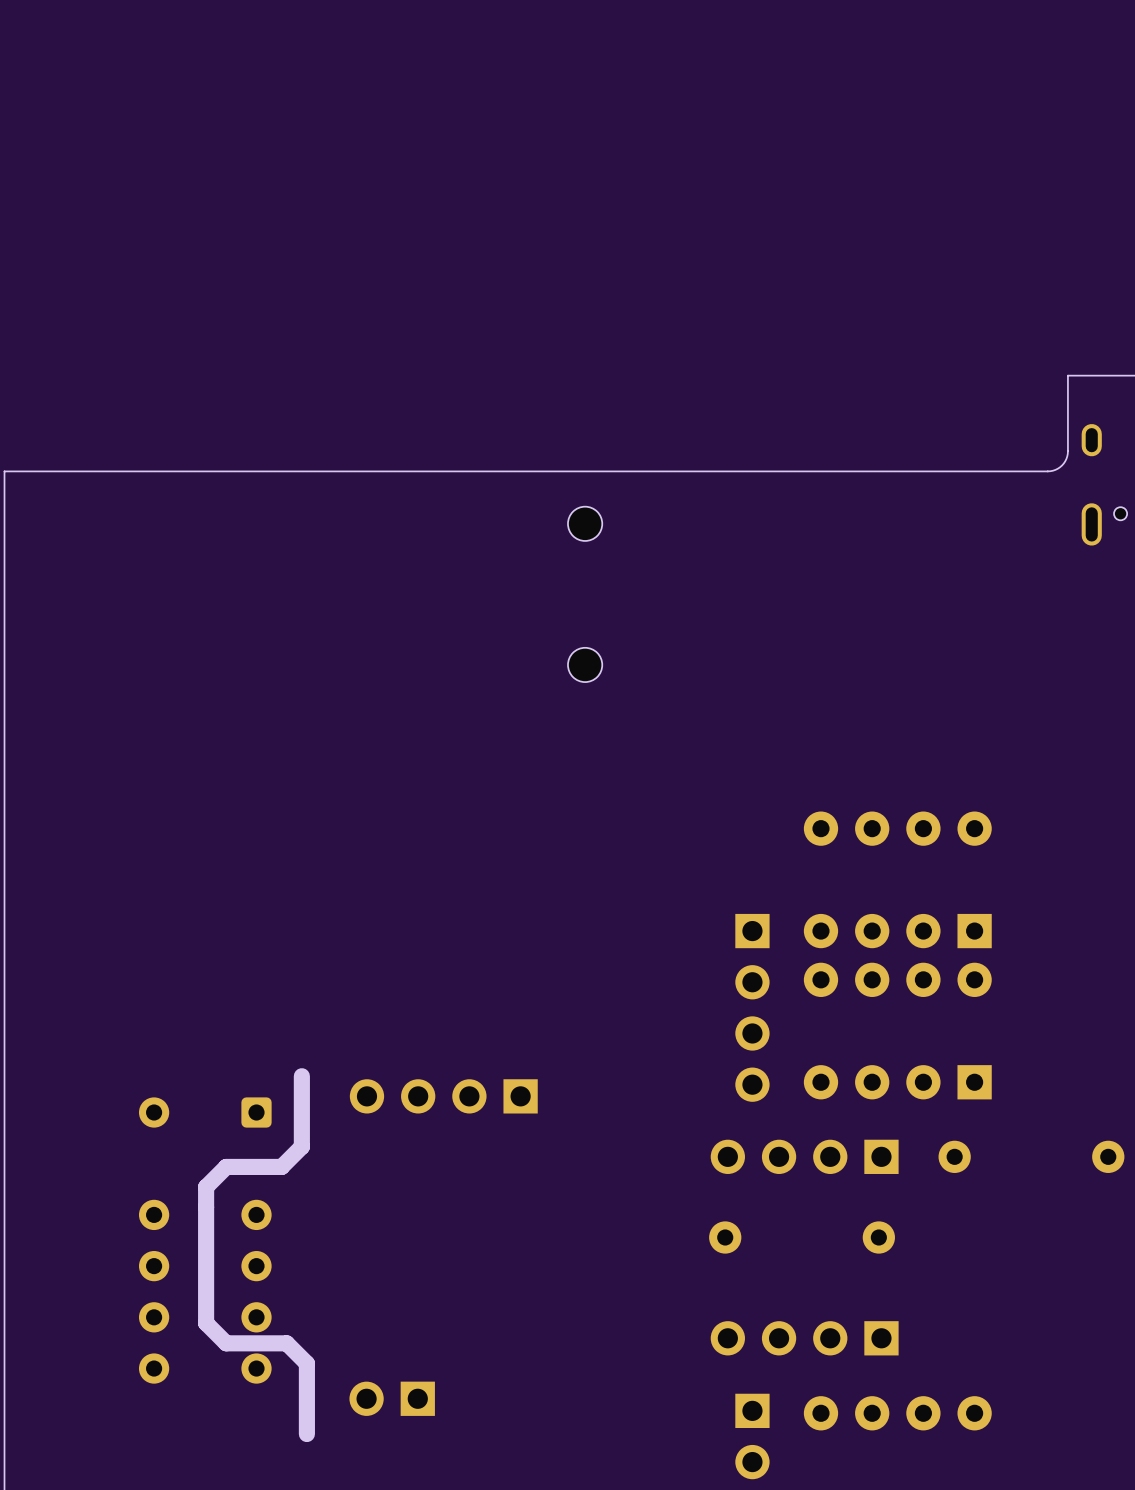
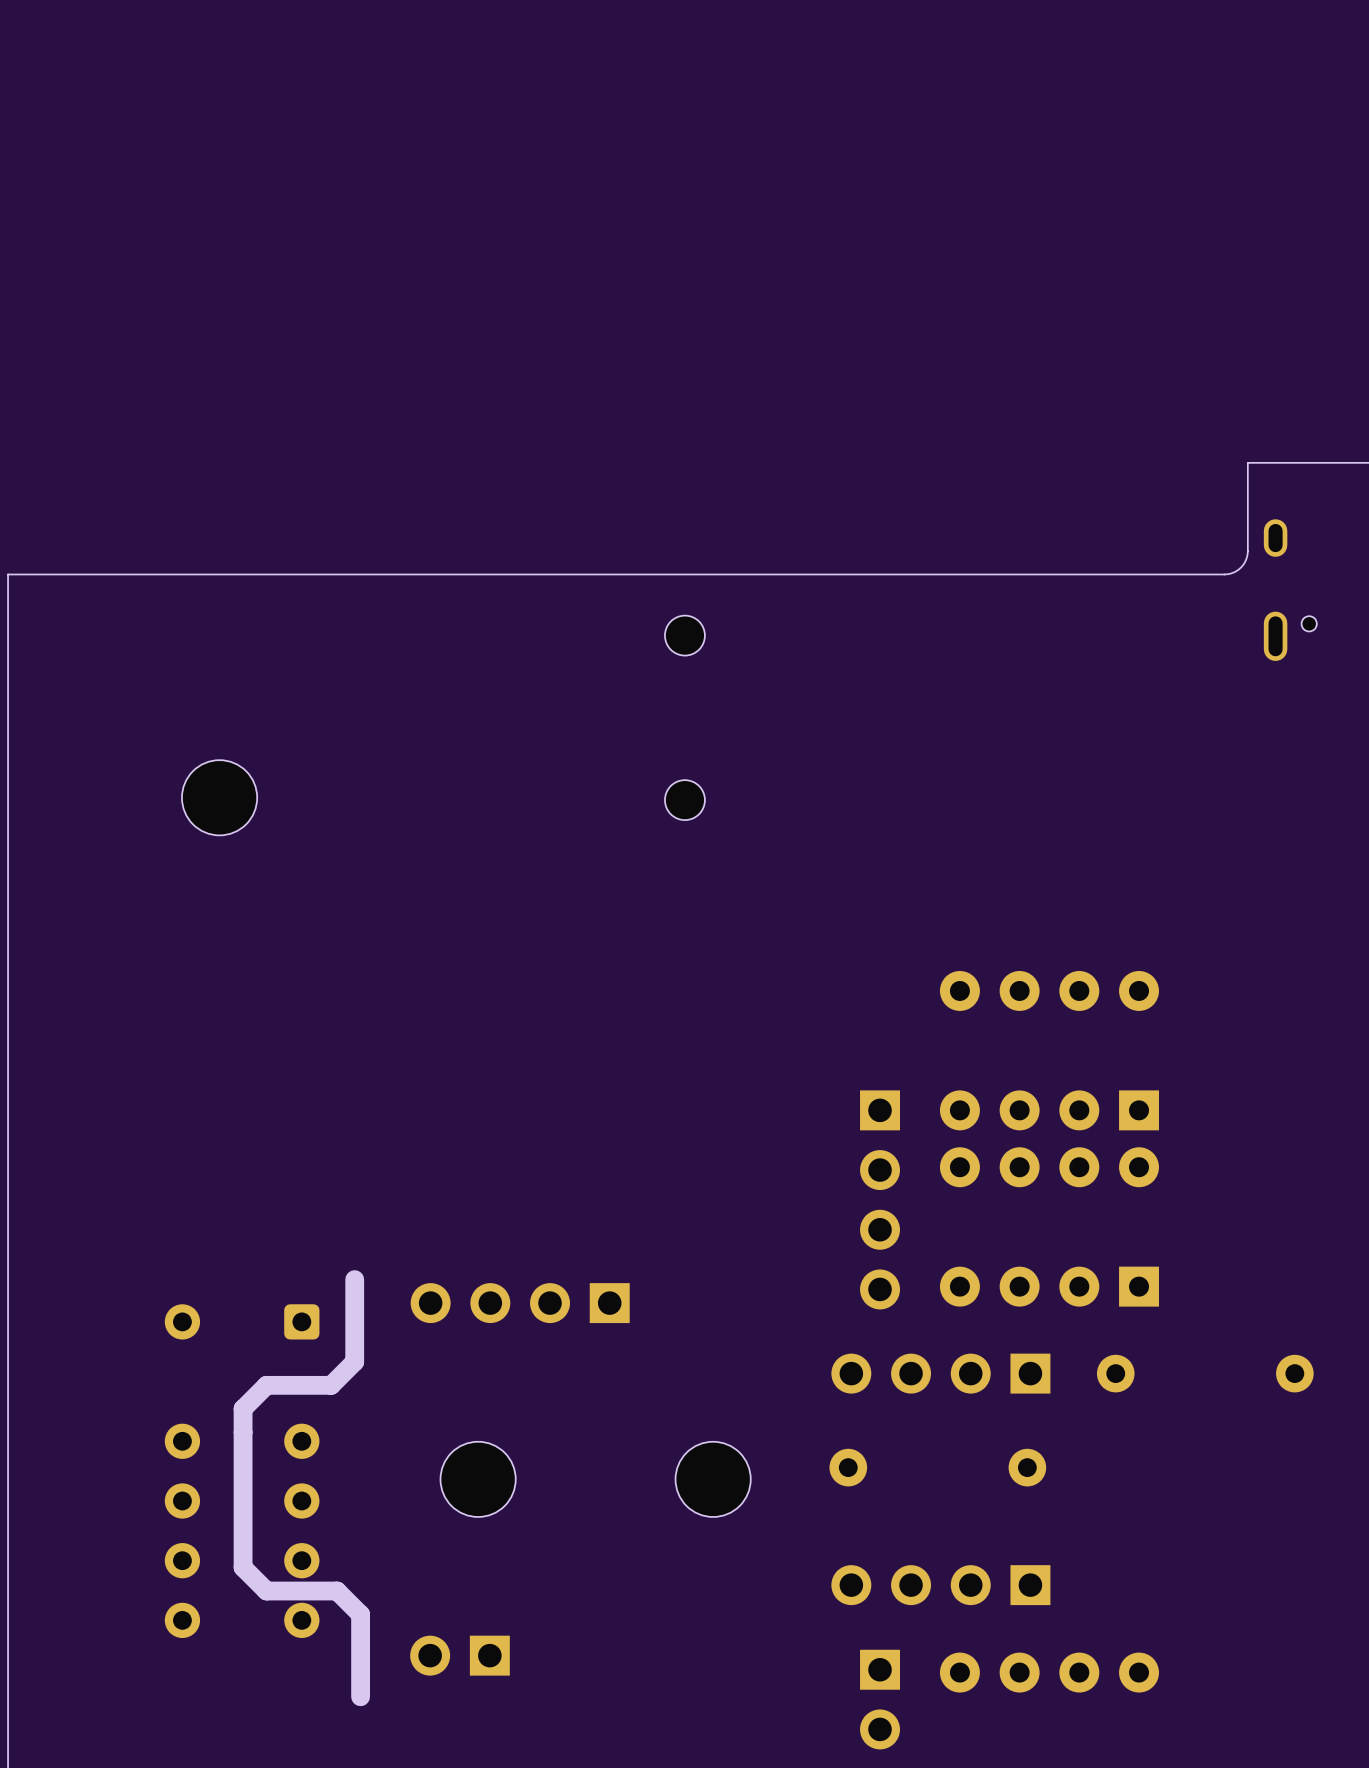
part: none -> (219, 797)
part: none -> (478, 1479)
part: none -> (713, 1479)

